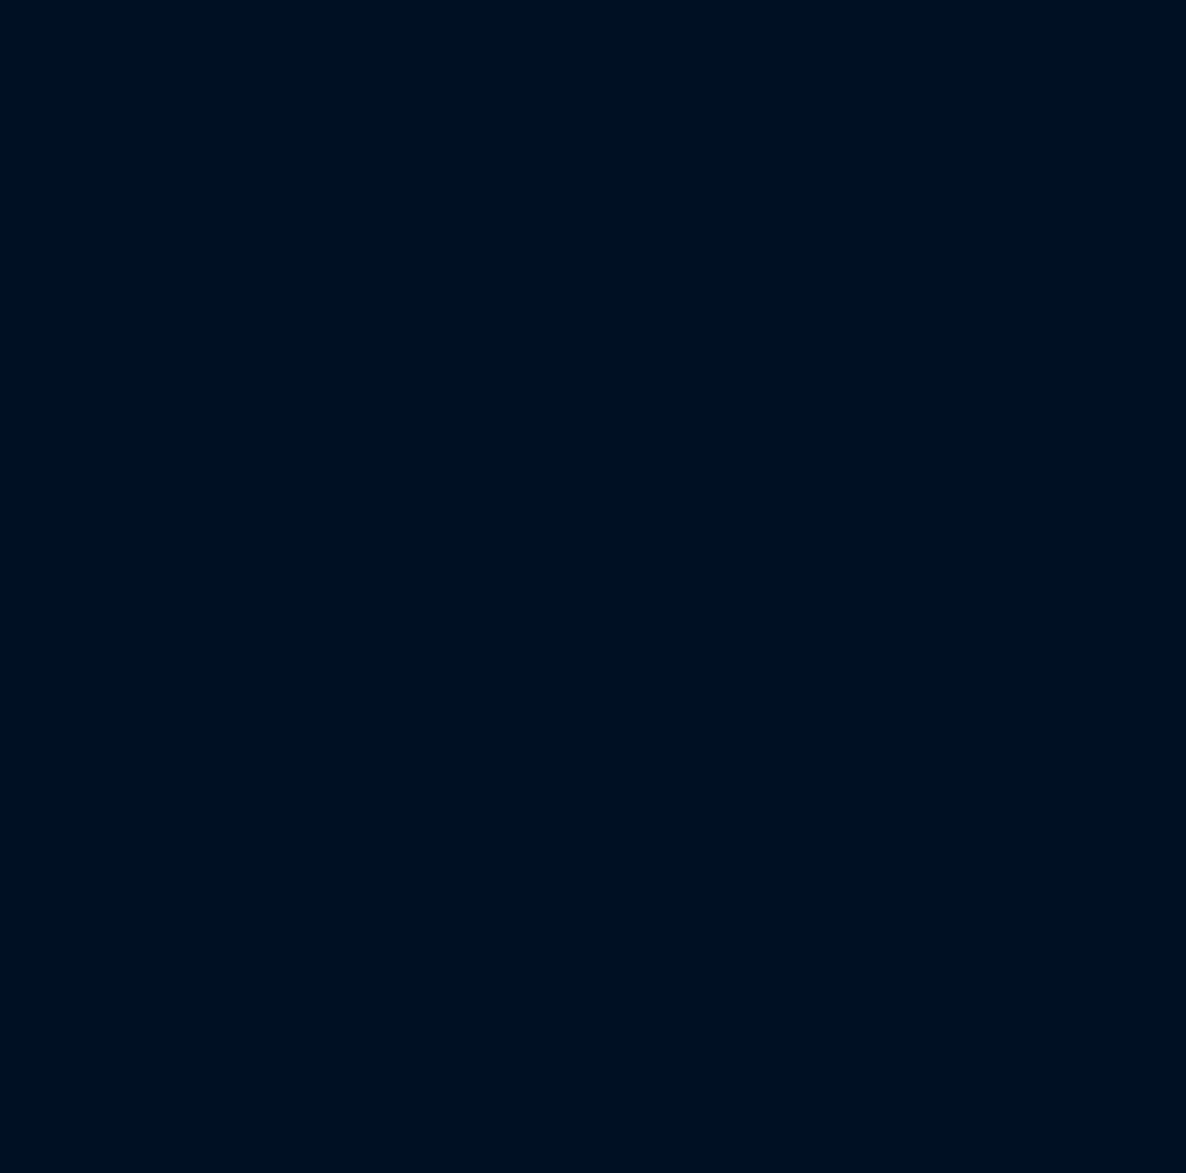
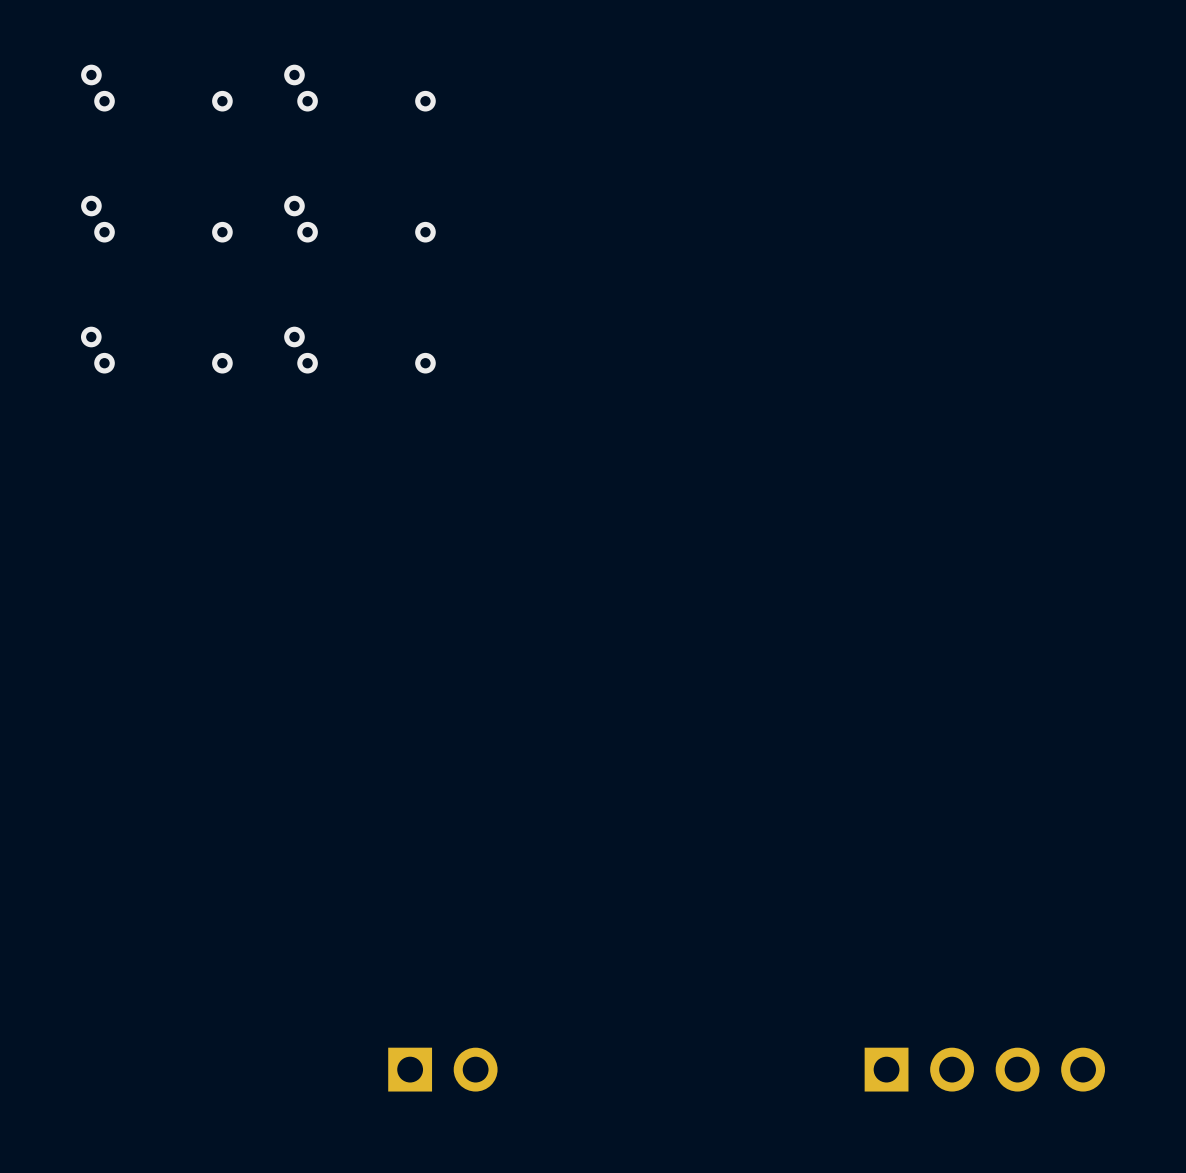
via: none -> (91, 74)
via: none -> (294, 74)
via: none -> (104, 101)
via: none -> (222, 101)
via: none -> (307, 101)
via: none -> (425, 101)
via: none -> (91, 205)
via: none -> (294, 205)
via: none -> (104, 232)
via: none -> (222, 232)
via: none -> (307, 232)
via: none -> (425, 232)
via: none -> (91, 337)
via: none -> (294, 337)
via: none -> (104, 363)
via: none -> (222, 363)
via: none -> (307, 363)
via: none -> (425, 363)
part: none -> (442, 1069)
part: none -> (984, 1069)

